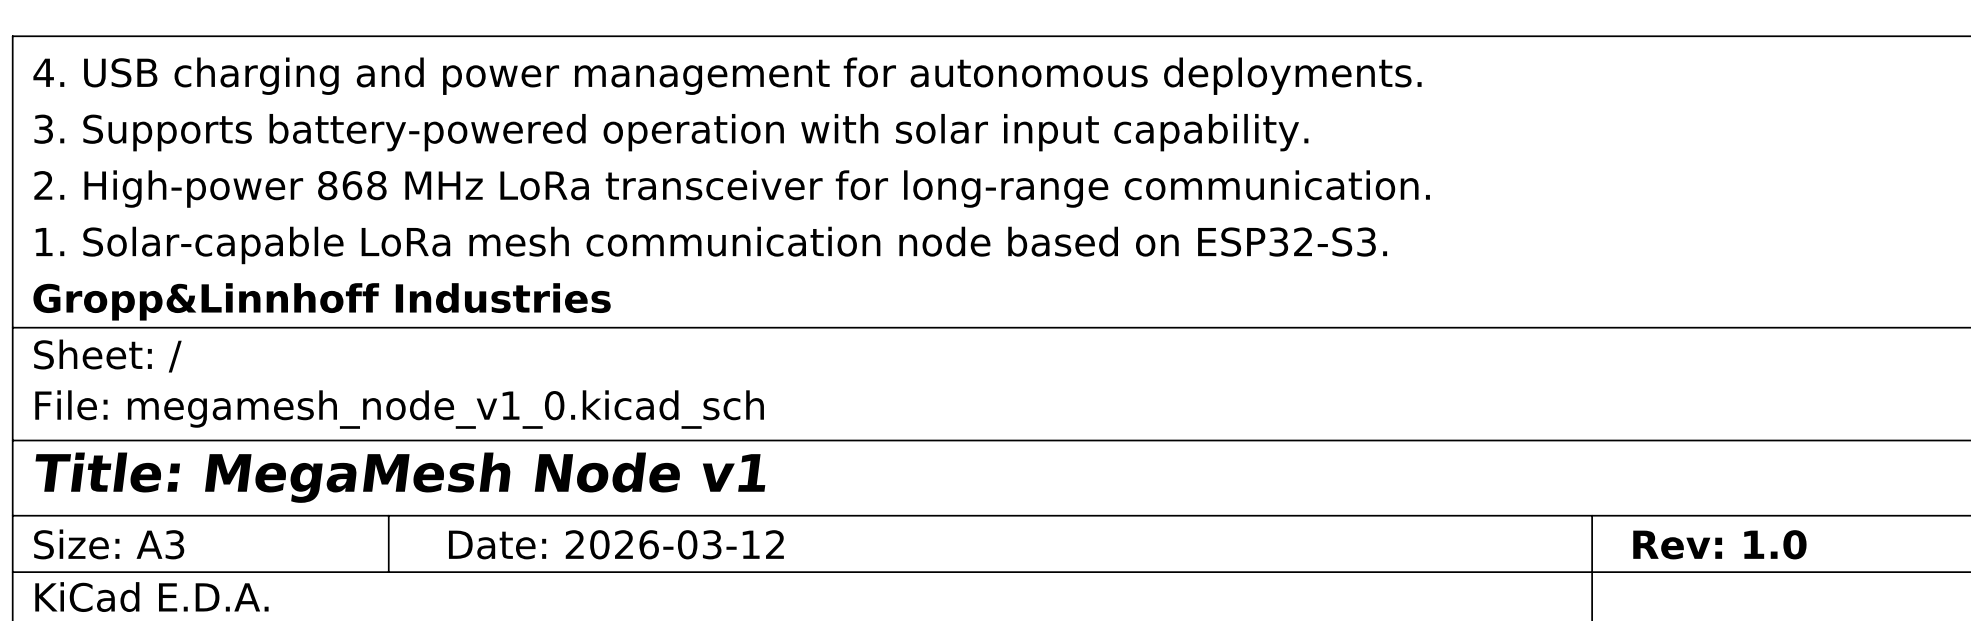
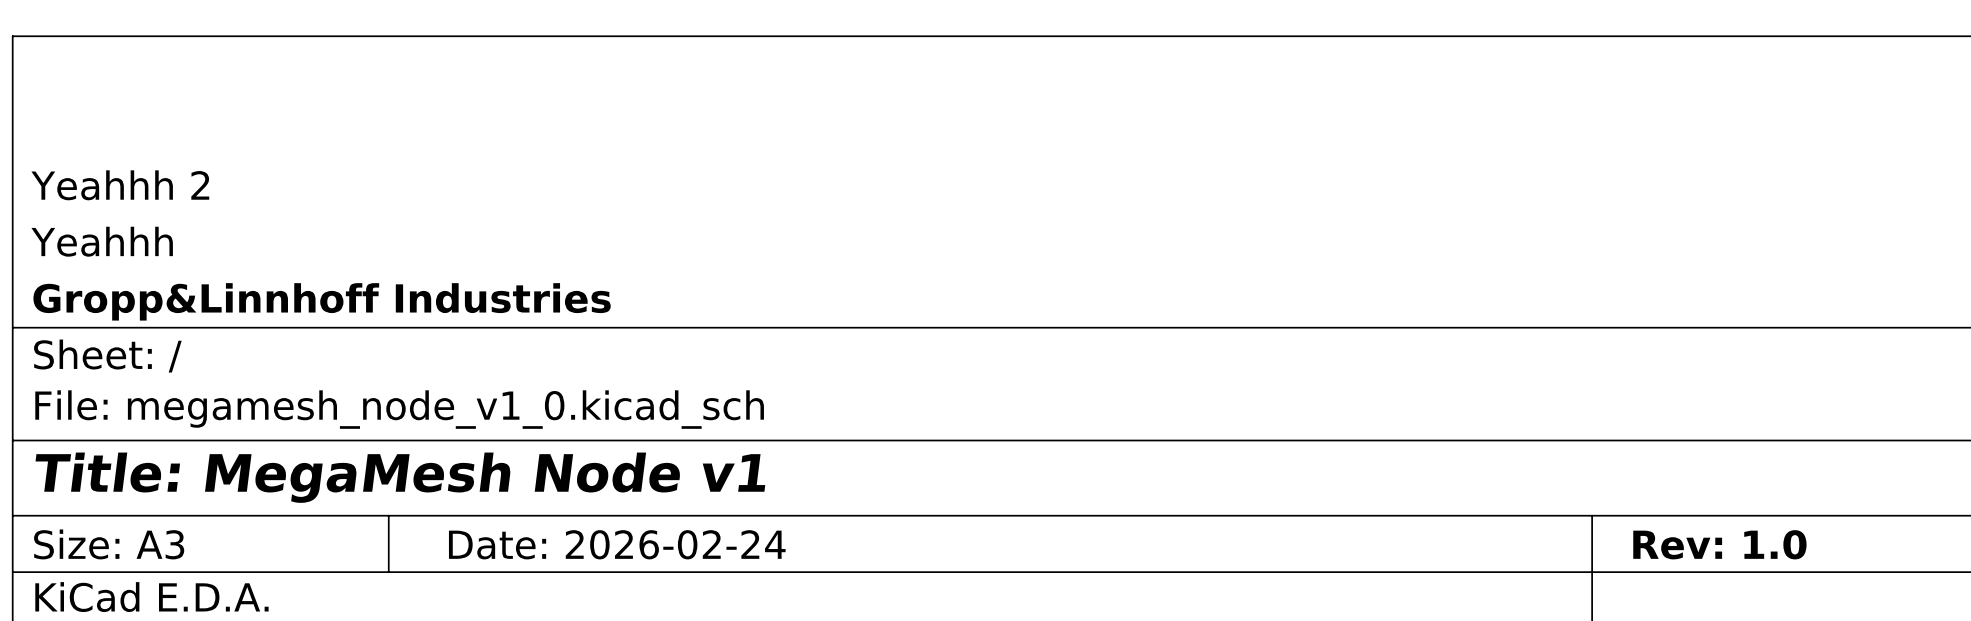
title block: 4. USB charging and power management for autonomous deployments. (727, 76) -> none
title block: 3. Supports battery-powered operation with solar input capability. (671, 132) -> none
title block: 2. High-power 868 MHz LoRa transceiver for long-range communication. (732, 189) -> Yeahhh 2 (120, 185)
title block: 1. Solar-capable LoRa mesh communication node based on ESP32-S3. (711, 245) -> Yeahhh (102, 241)
title block: Date: 2026-03-12 (616, 544) -> Date: 2026-02-24 (617, 544)

